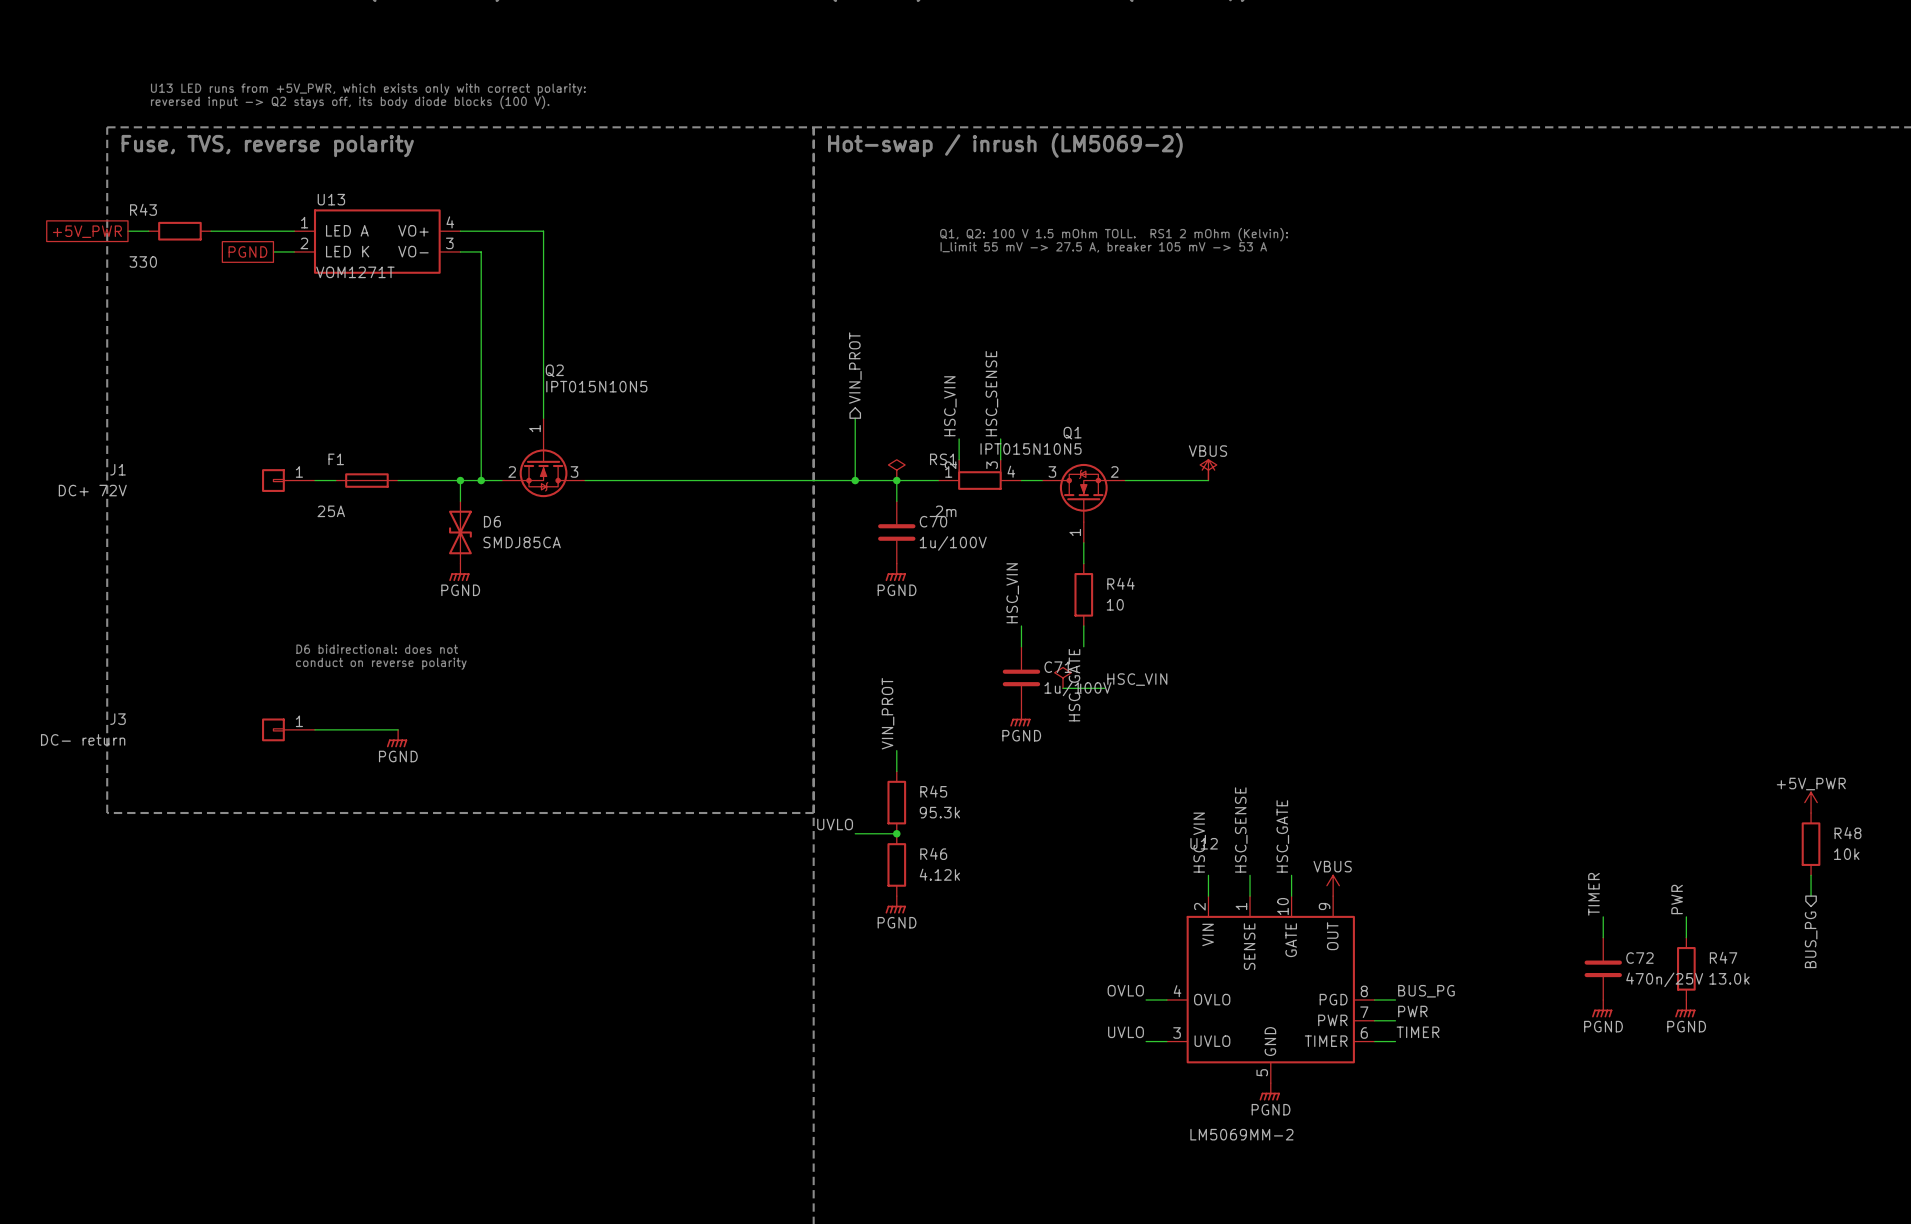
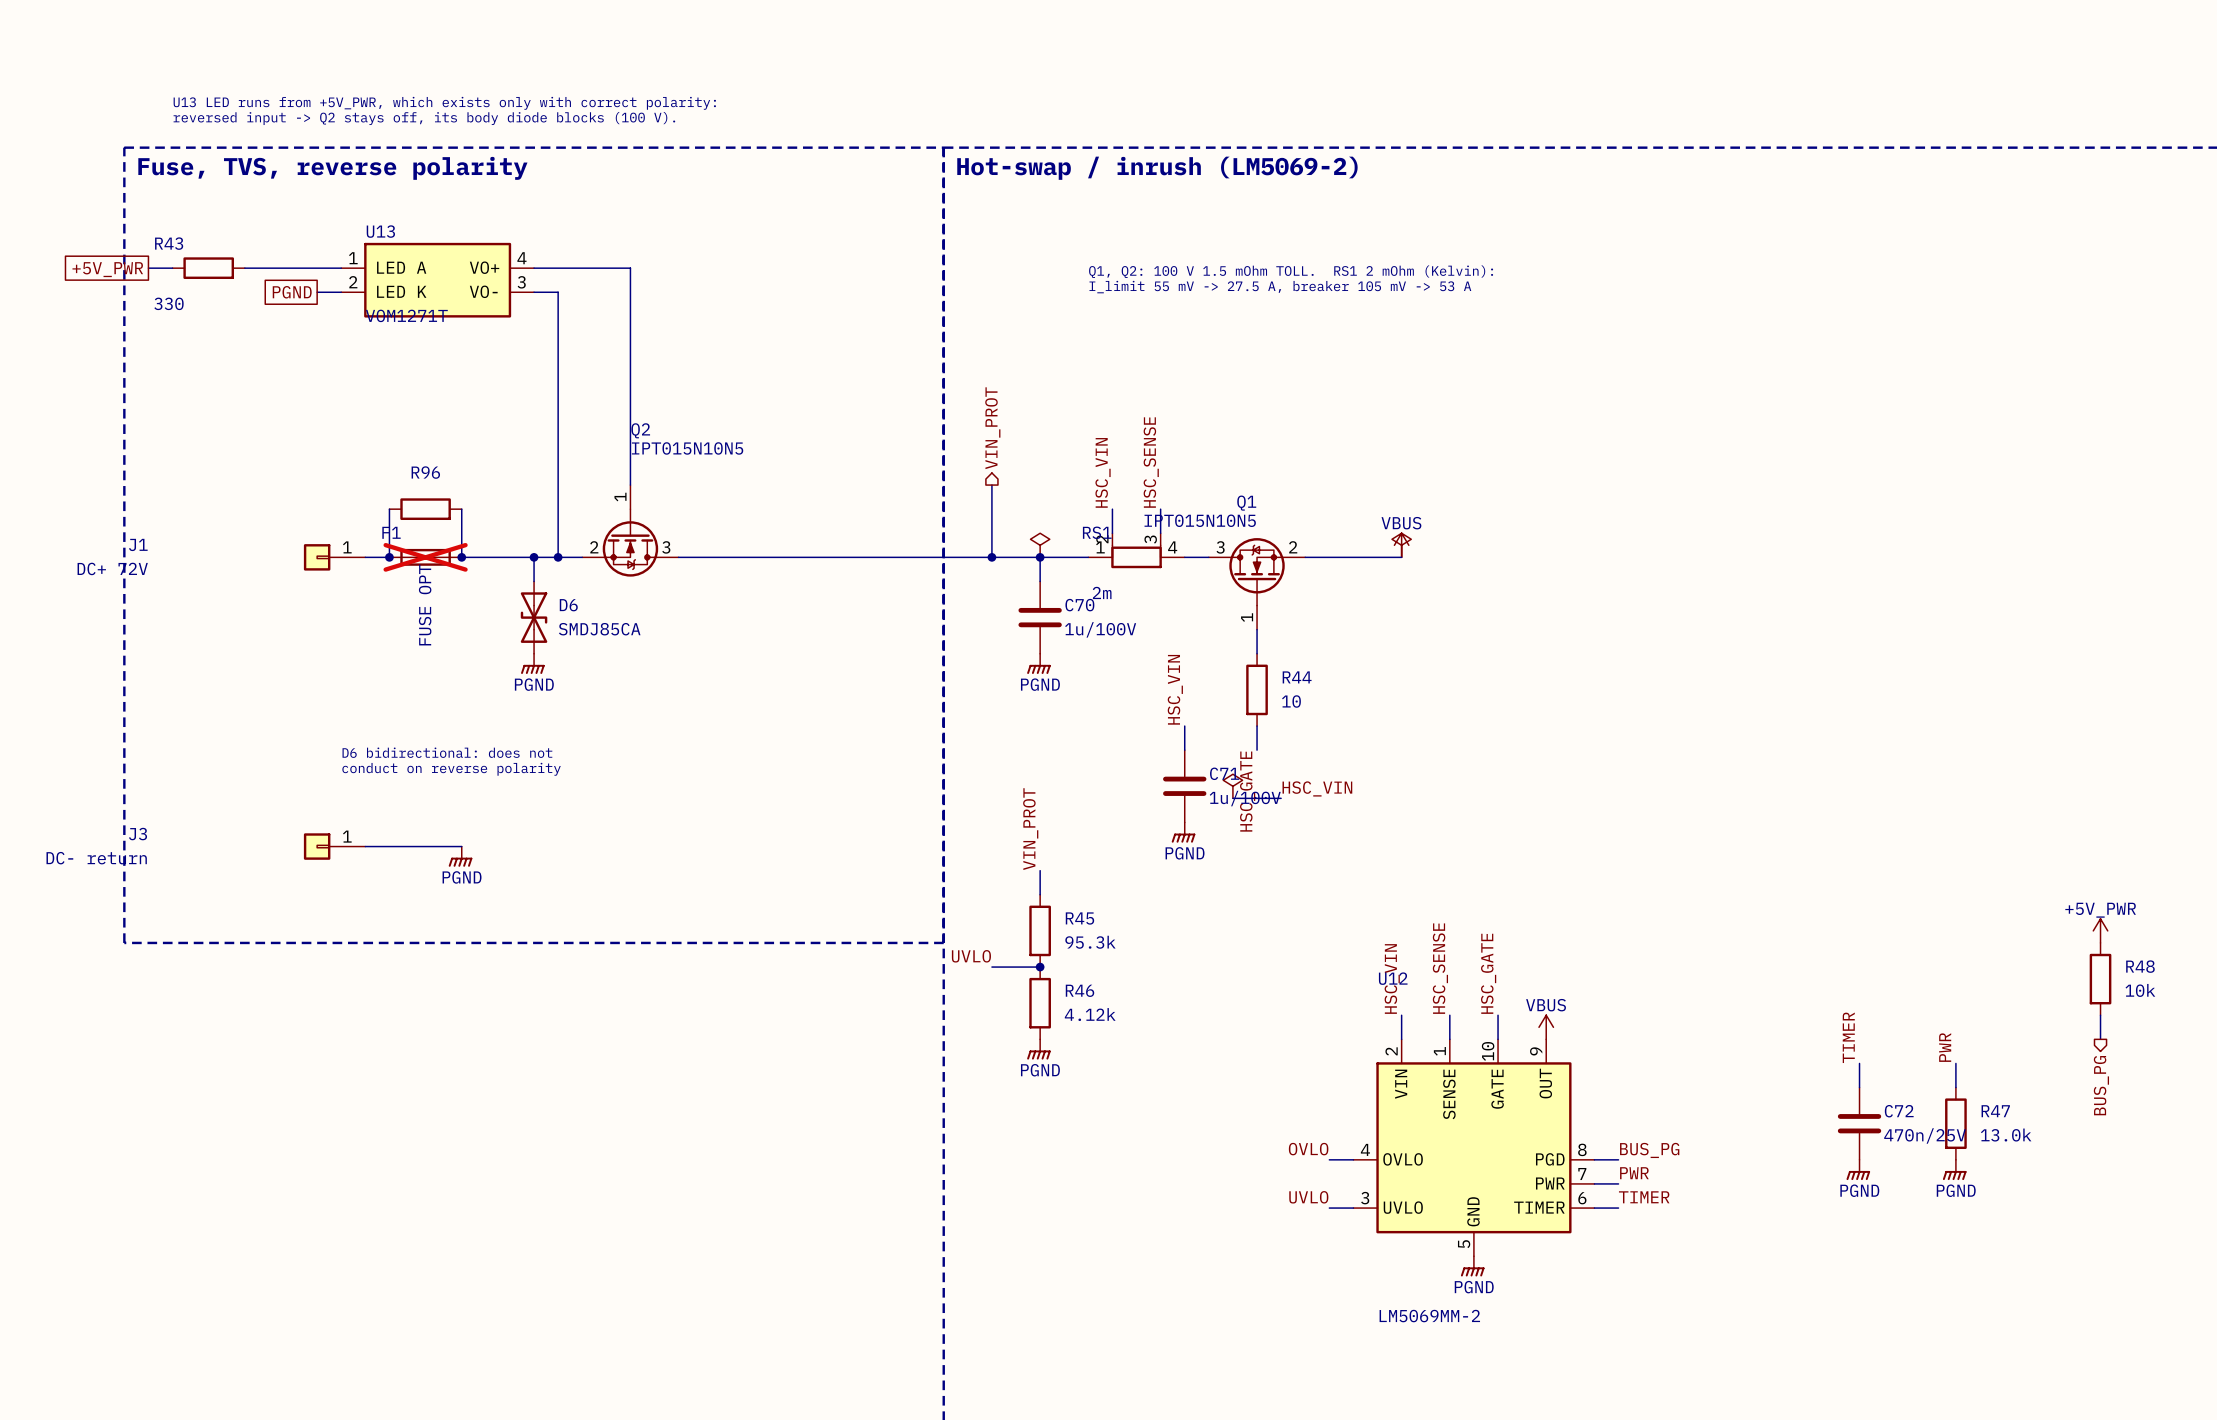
wire: none -> (389, 509) (389, 557)
R96: none -> (425, 509)
wire: none -> (461, 509) (461, 557)
junction: none -> (389, 557)
F1 do-not-place cross: none -> (425, 557)
junction: none -> (461, 557)
F1 value: 25A (331, 511) -> FUSE OPT (425, 604)

